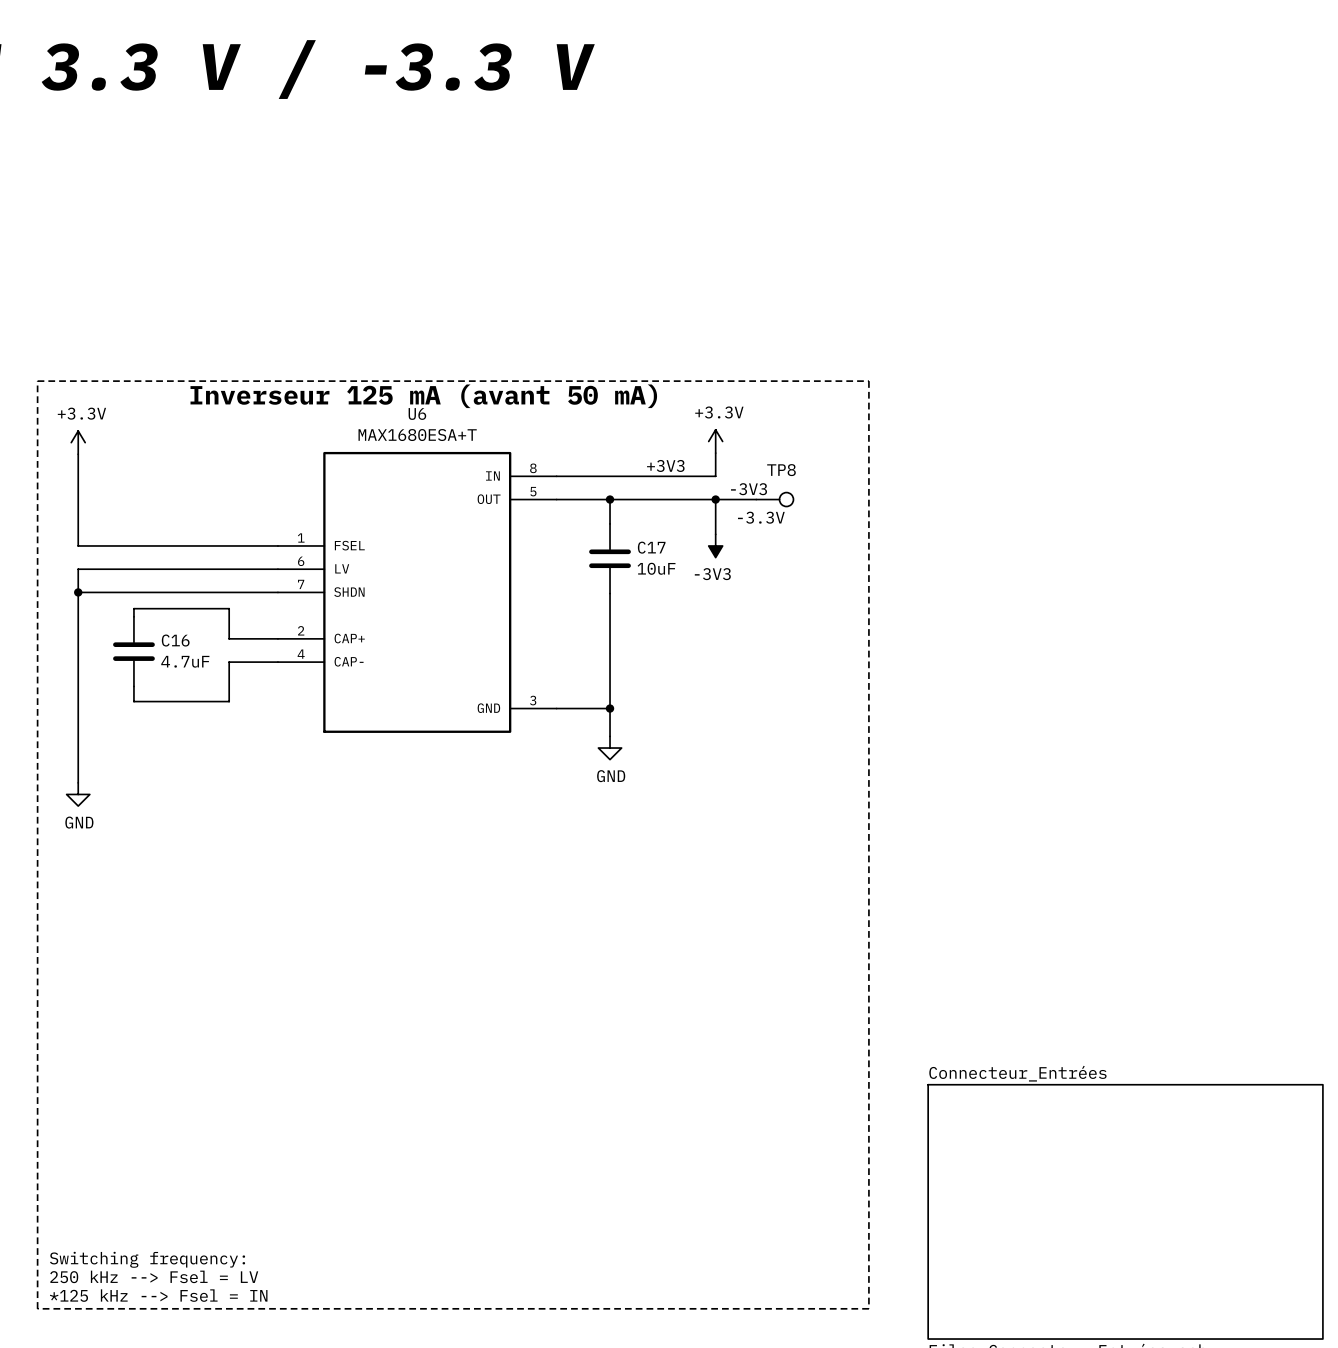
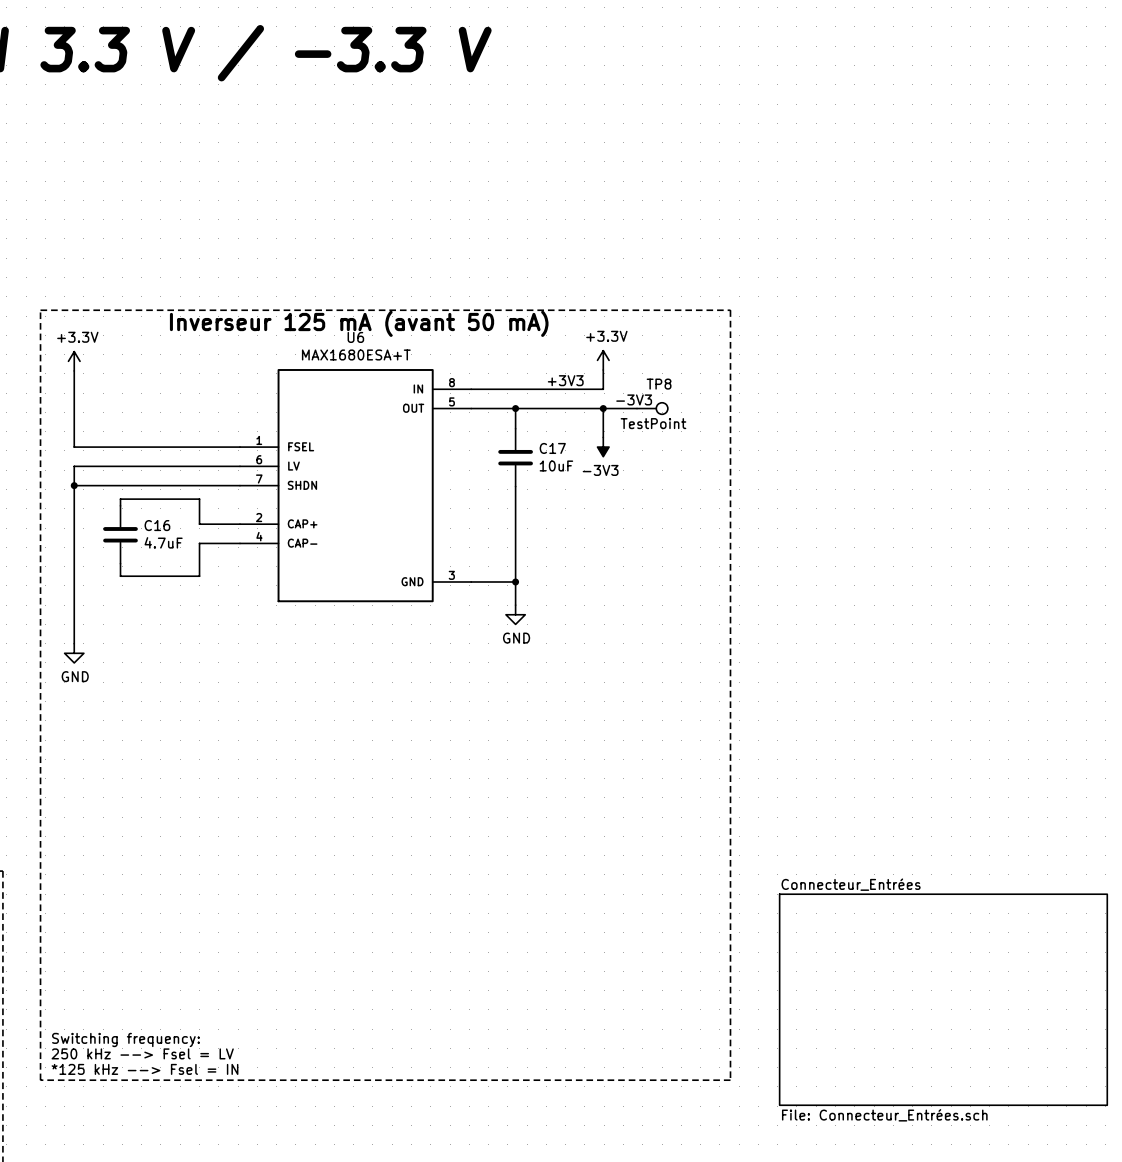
TP8 value: -3.3V (761, 517) -> TestPoint (653, 423)

